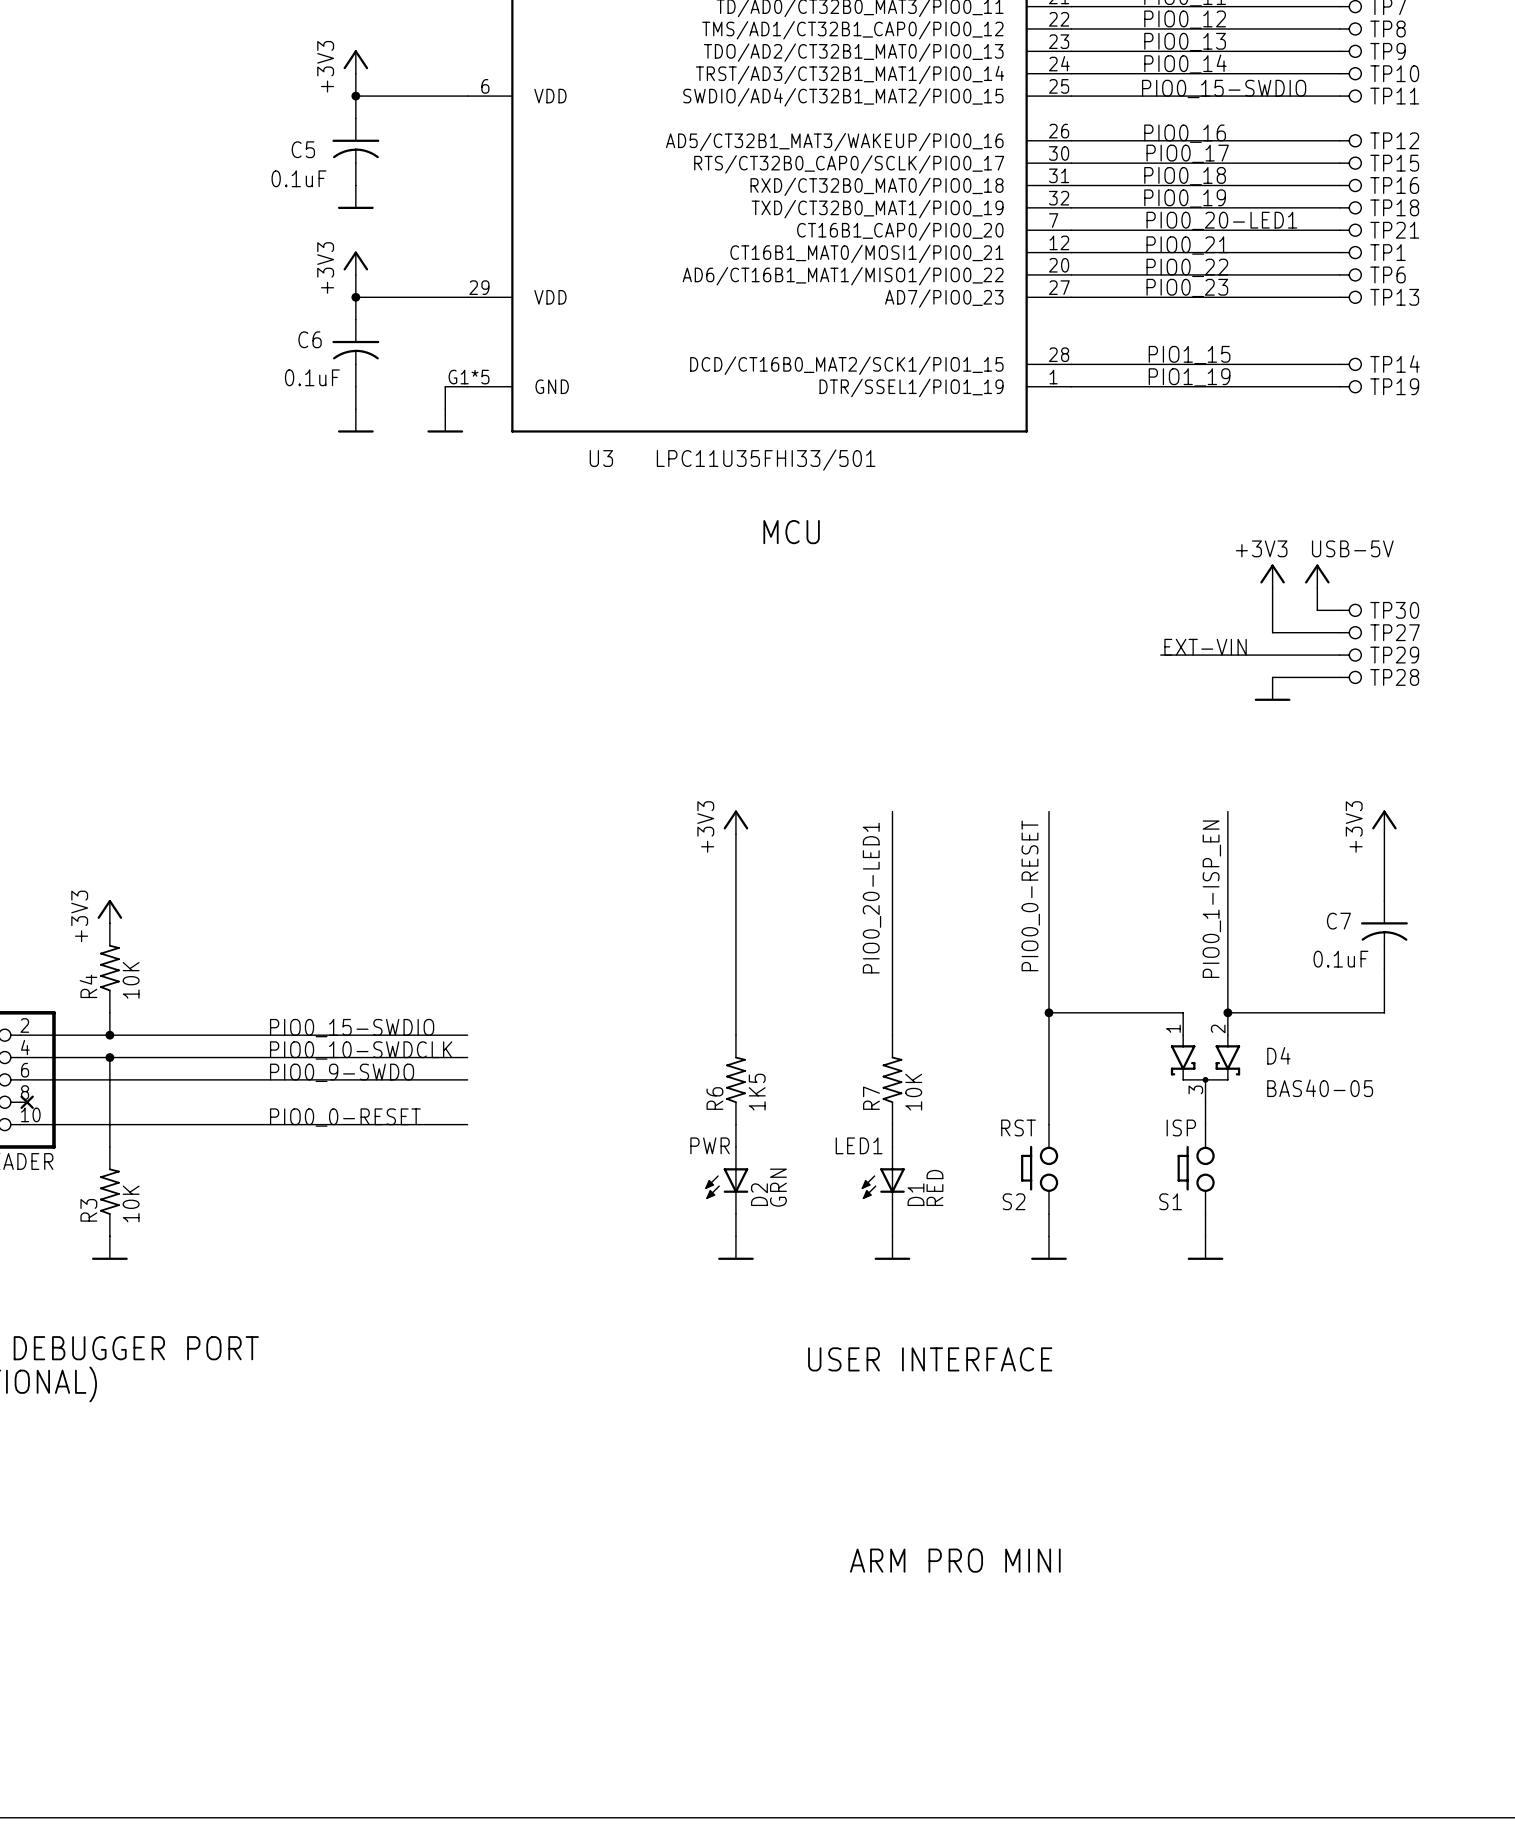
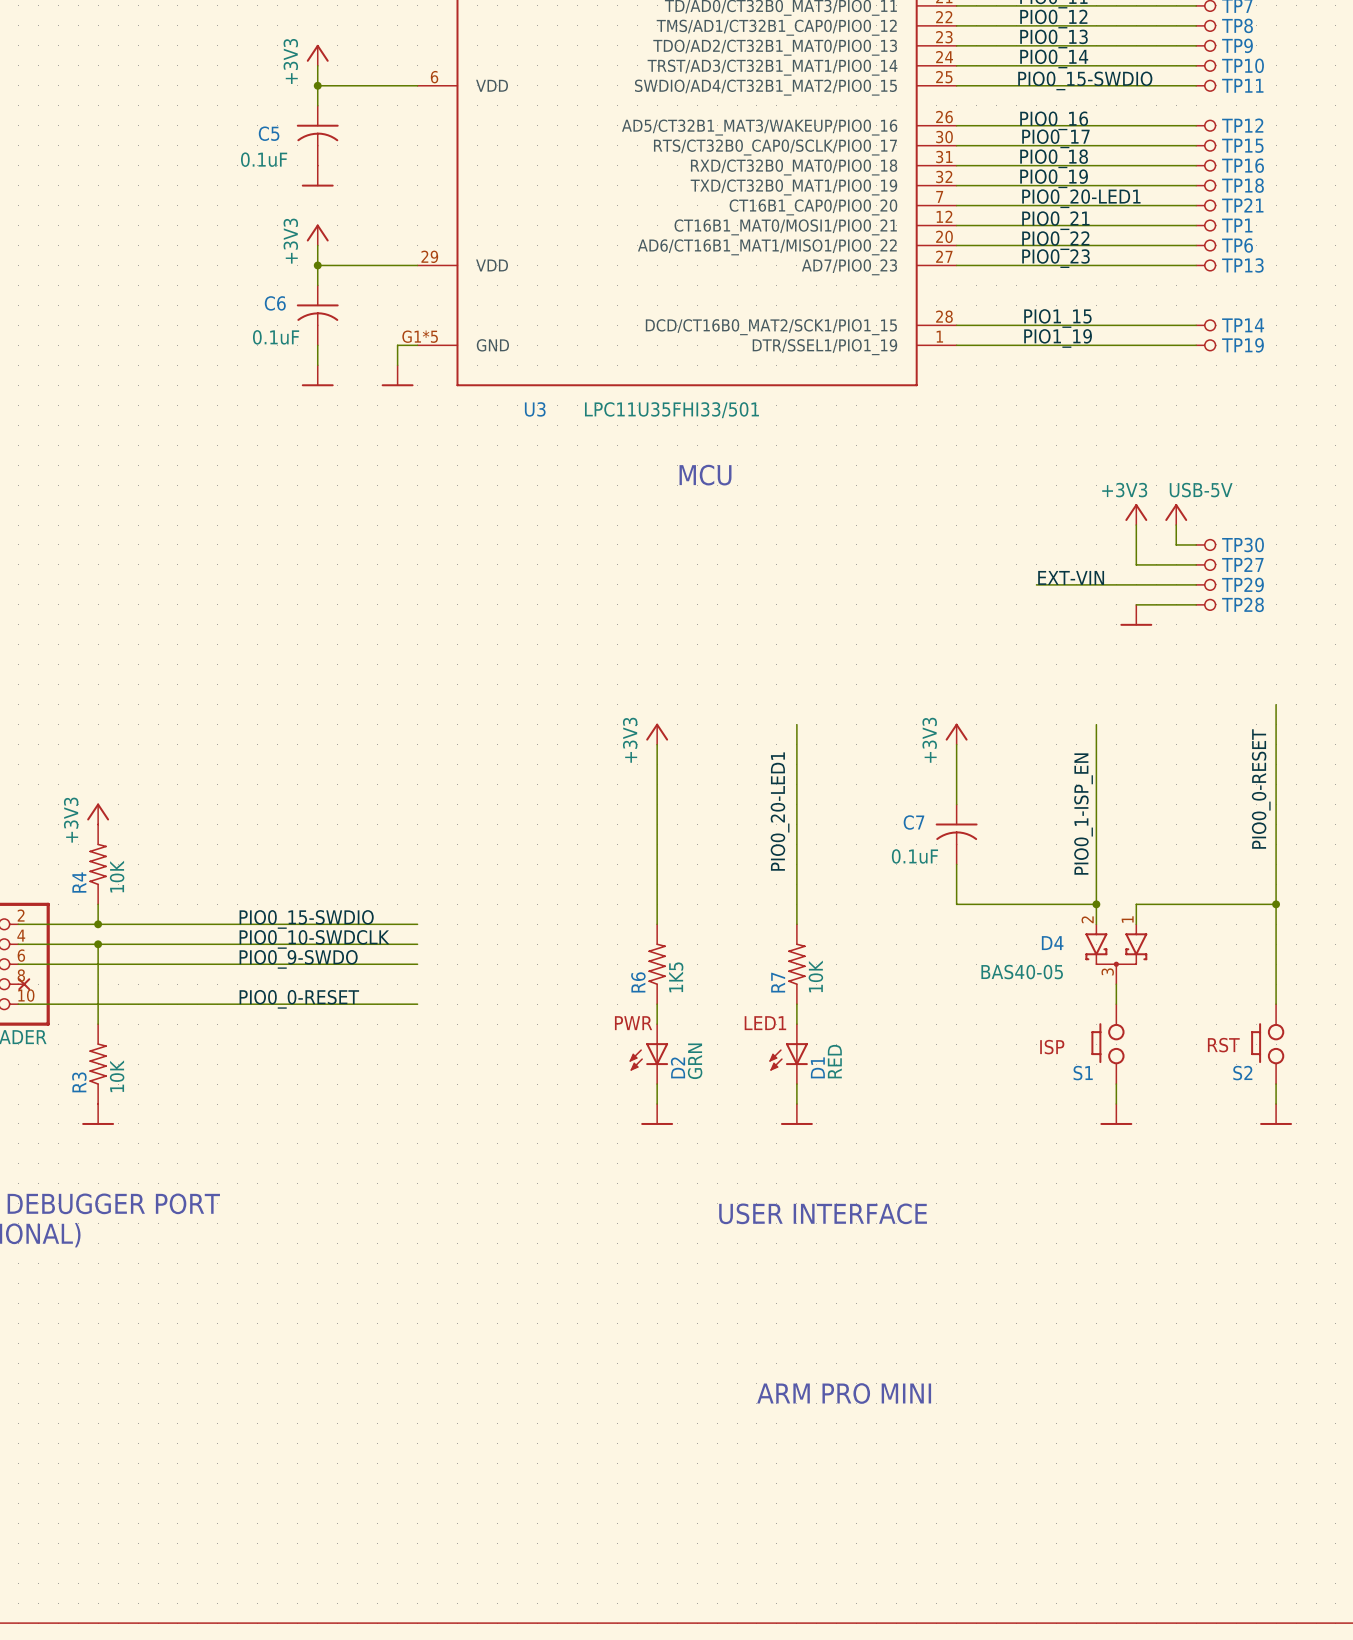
wire: none -> (1276, 704) (1276, 1004)
wire: (1049, 811) (1049, 1124) -> none
power symbol: none -> +3V3 (956, 734)
power symbol: +3V3 (1384, 822) -> none
wire: none -> (956, 744) (956, 804)
wire: (1384, 833) (1384, 901) -> none
label: none -> PIO0_0-RESET (1261, 789)
label: PIO0_0-RESET (1030, 895) -> none
C7 position: (1384, 934) -> (956, 834)
wire: (1384, 968) (1384, 1012) -> (1276, 904) (1236, 904)
wire: (1049, 1012) (1071, 1012) -> (956, 864) (956, 904)
junction: (1049, 1012) -> none
wire: (1183, 1012) (1183, 1035) -> (1056, 904) (1096, 904)
wire: (1227, 1012) (1272, 1012) -> (1136, 924) (1136, 904)
junction: none -> (1276, 904)
D4 flip: as is (1205, 1058) -> left-right (1116, 945)
D4 position: (1205, 1068) -> (1116, 953)
wire: (1205, 1102) (1205, 1124) -> (1116, 984) (1116, 1004)
text: RST (1018, 1127) -> none
text position: ISP (1181, 1127) -> ISP (1052, 1047)
S2 position: (1039, 1169) -> (1267, 1044)
S1 position: (1196, 1169) -> (1107, 1044)
text: none -> RST (1223, 1045)
wire: (1049, 1214) (1049, 1236) -> none
wire: (1205, 1214) (1205, 1236) -> (1116, 1084) (1116, 1104)
wire: none -> (1276, 1084) (1276, 1104)
power symbol: (1049, 1248) -> none
power symbol position: (1205, 1248) -> (1116, 1114)
power symbol: none -> (1276, 1114)

